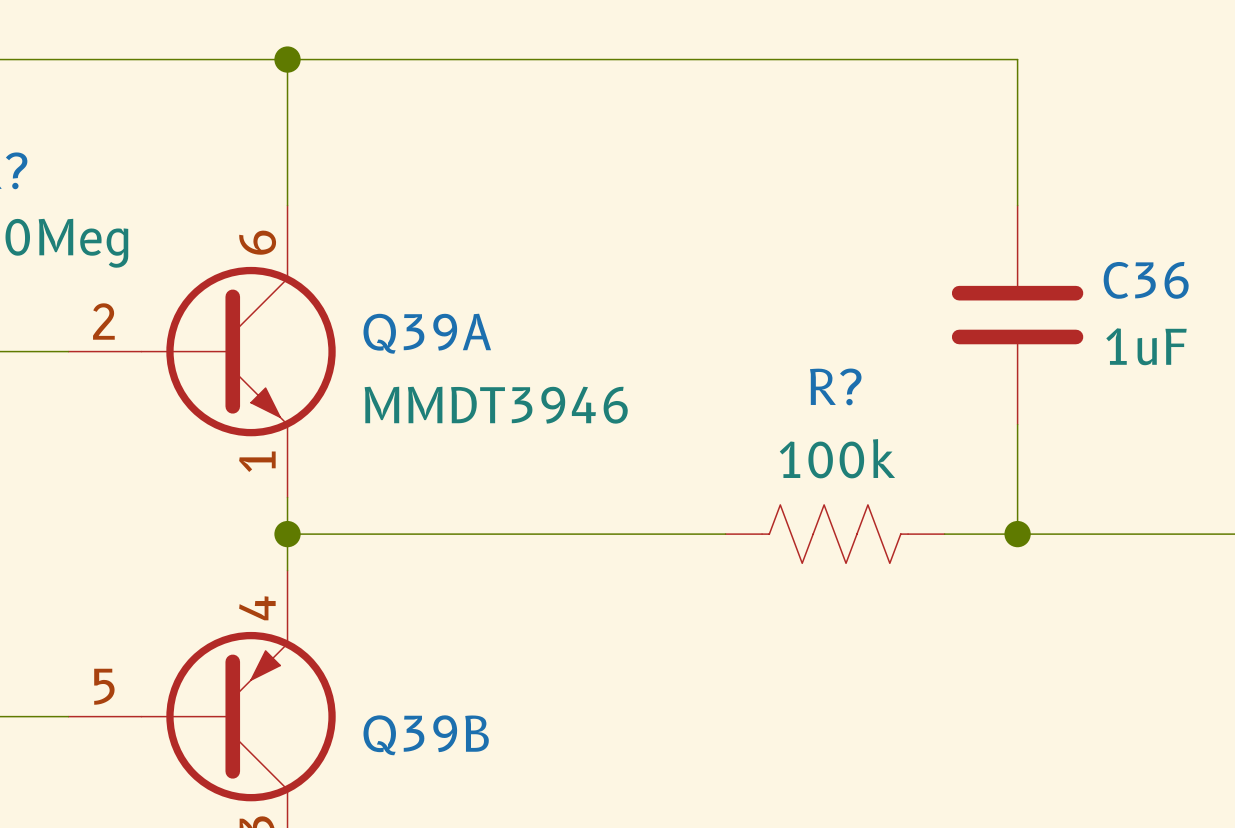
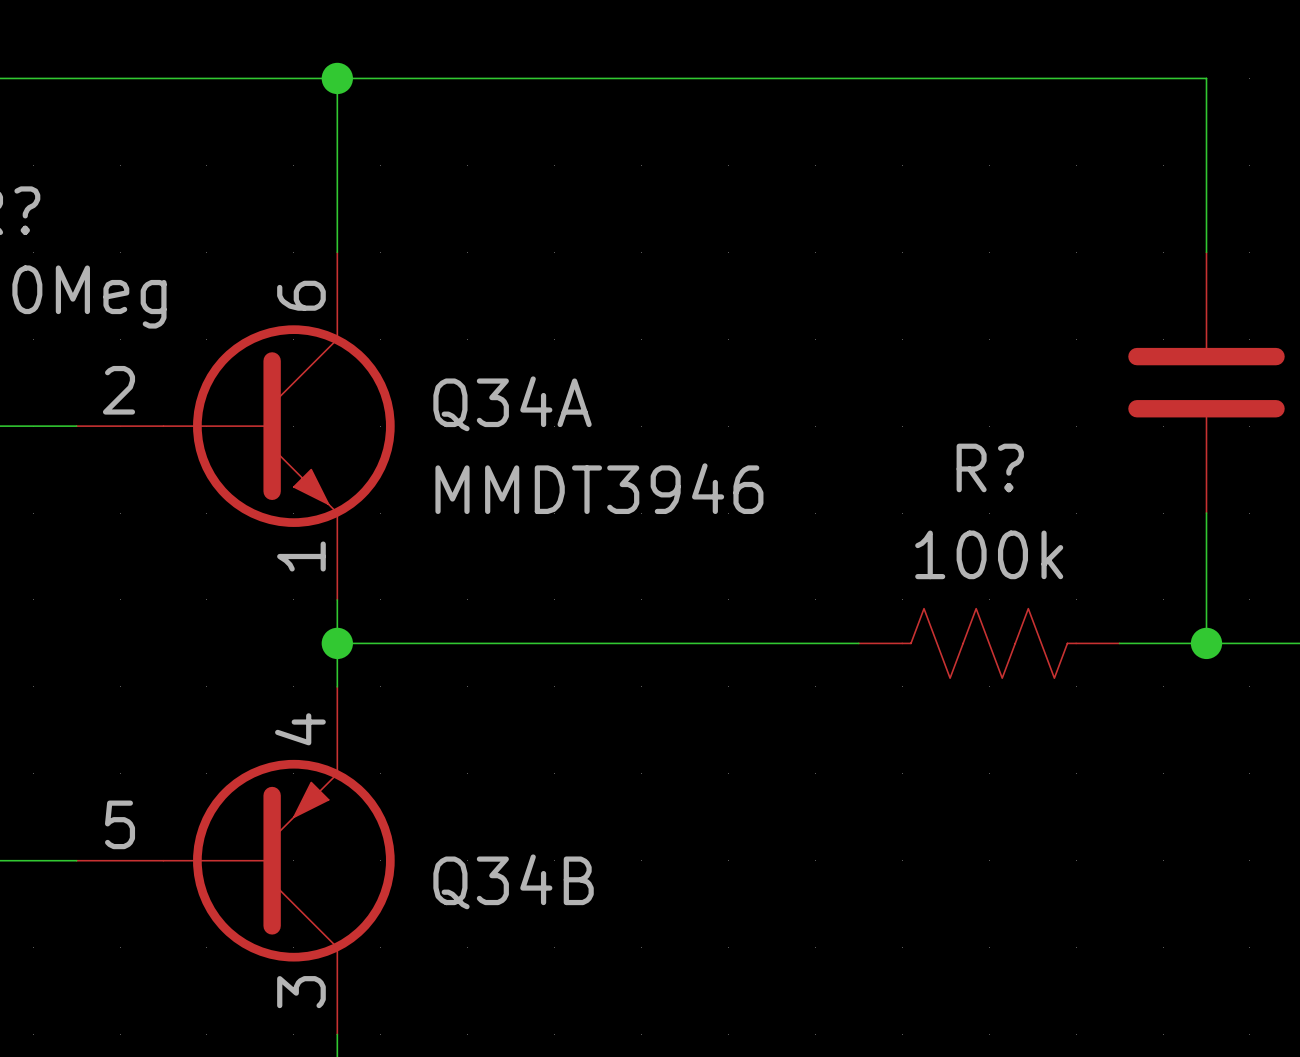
Q39A name: Q39A (427, 333) -> Q34A (512, 403)
Q39B name: Q39B (426, 735) -> Q34B (513, 881)

